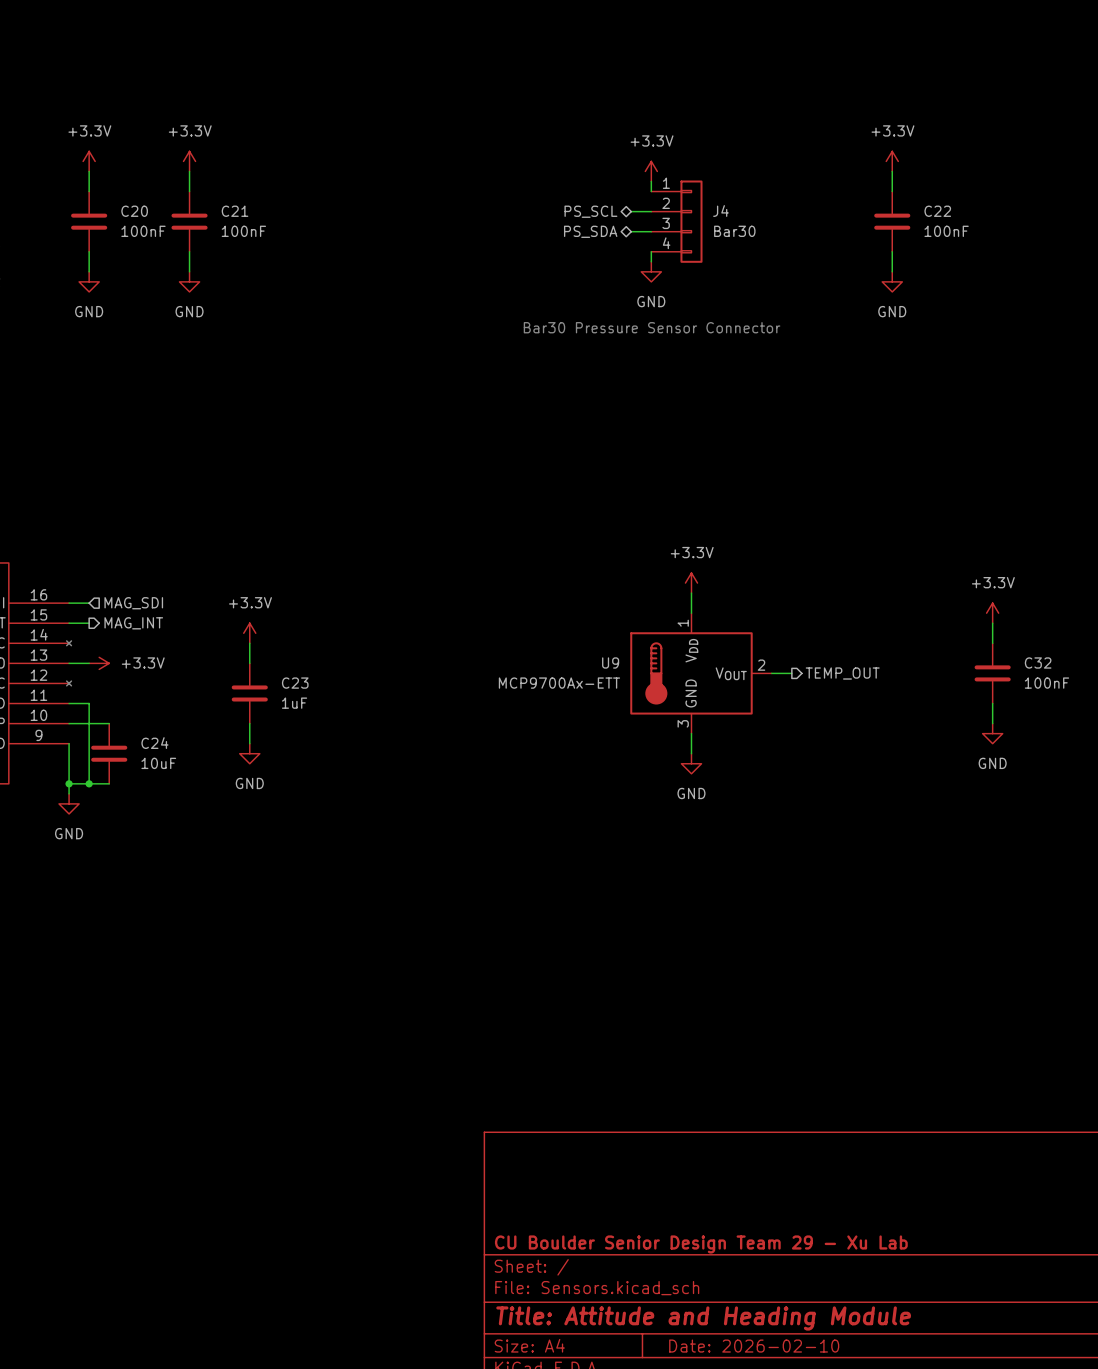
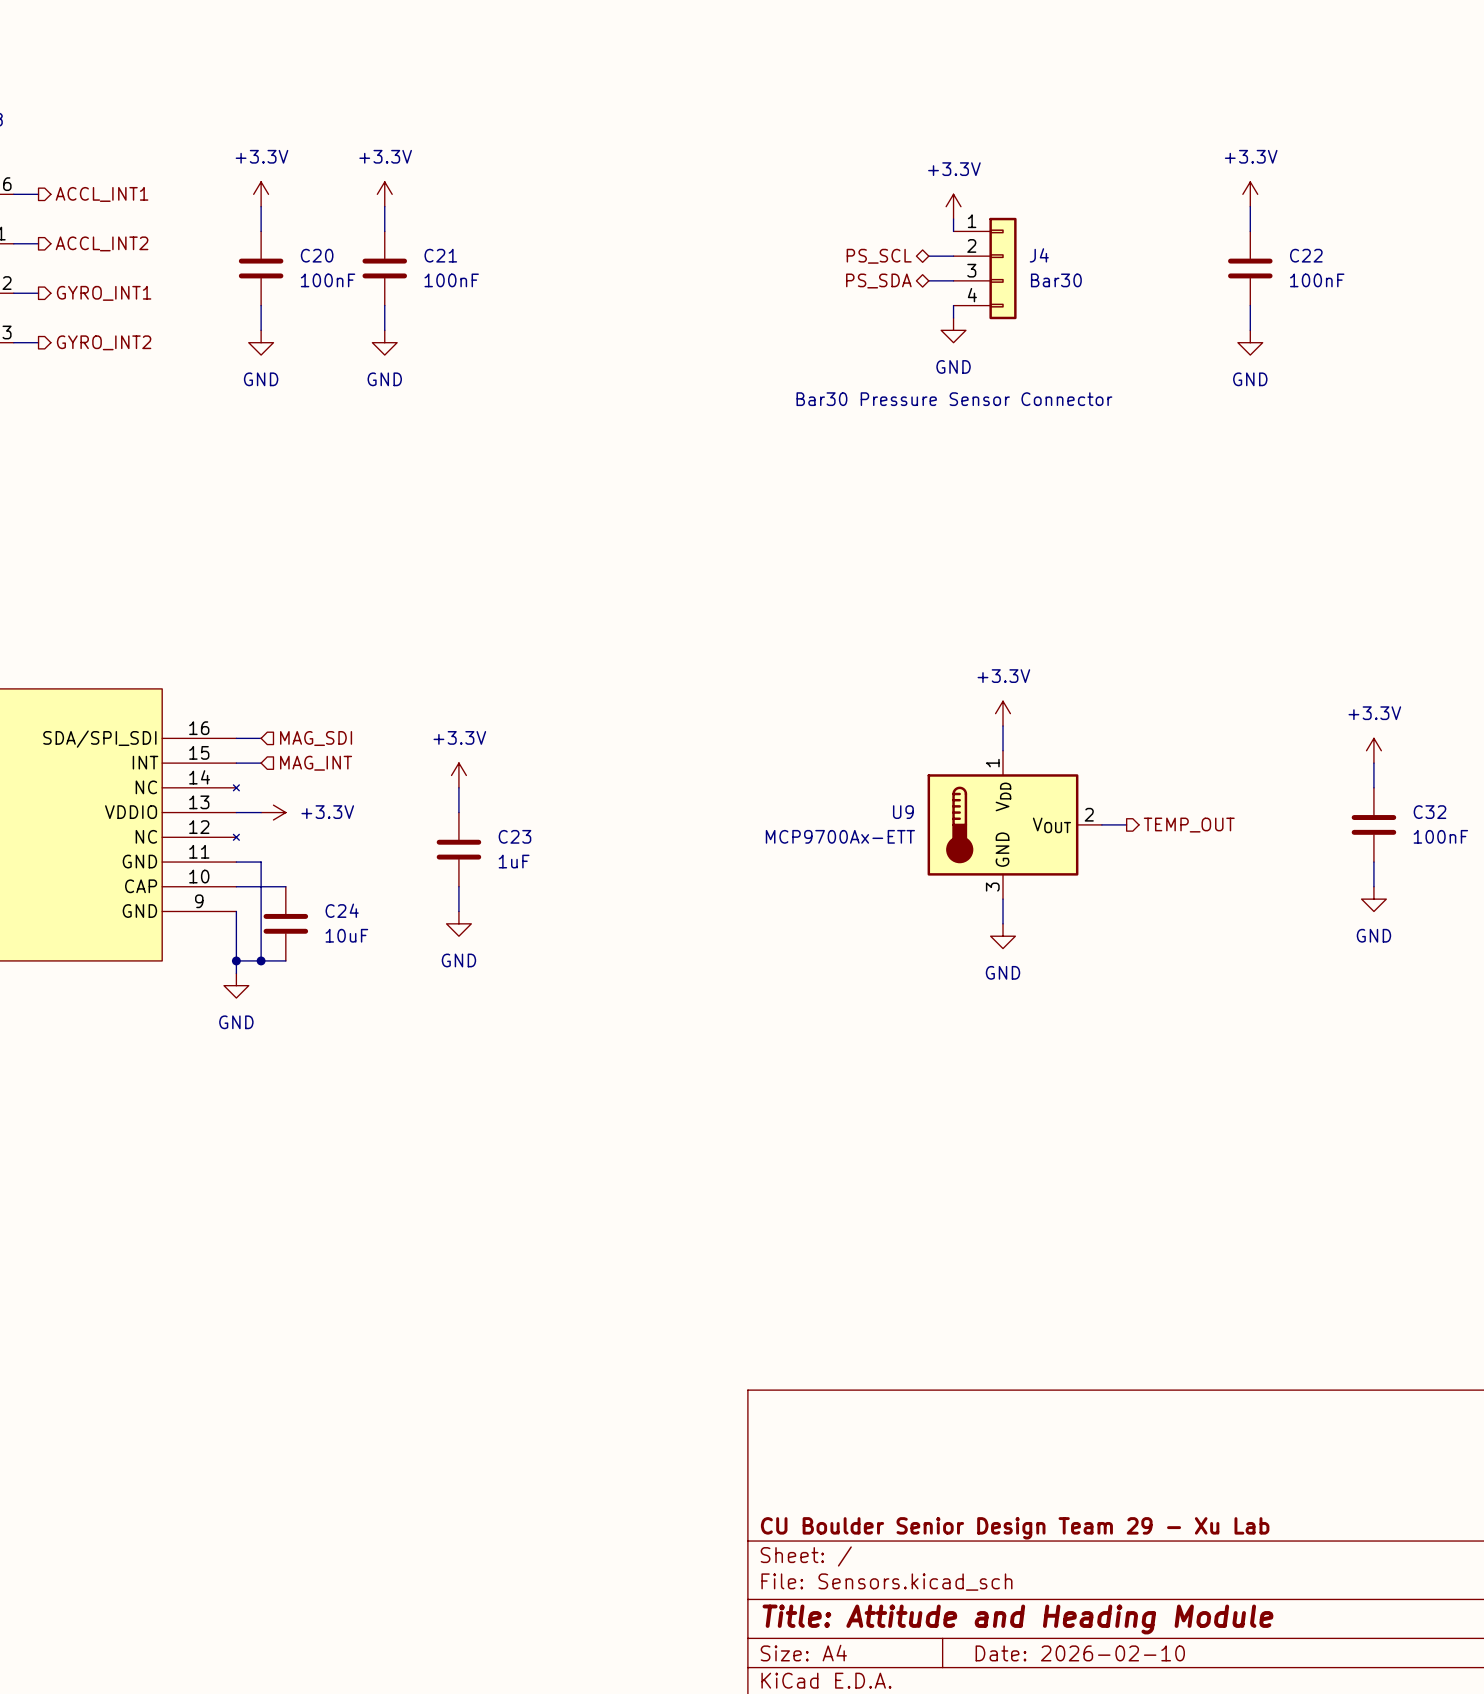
hierarchical label shape: output (133, 623) -> input (316, 763)

